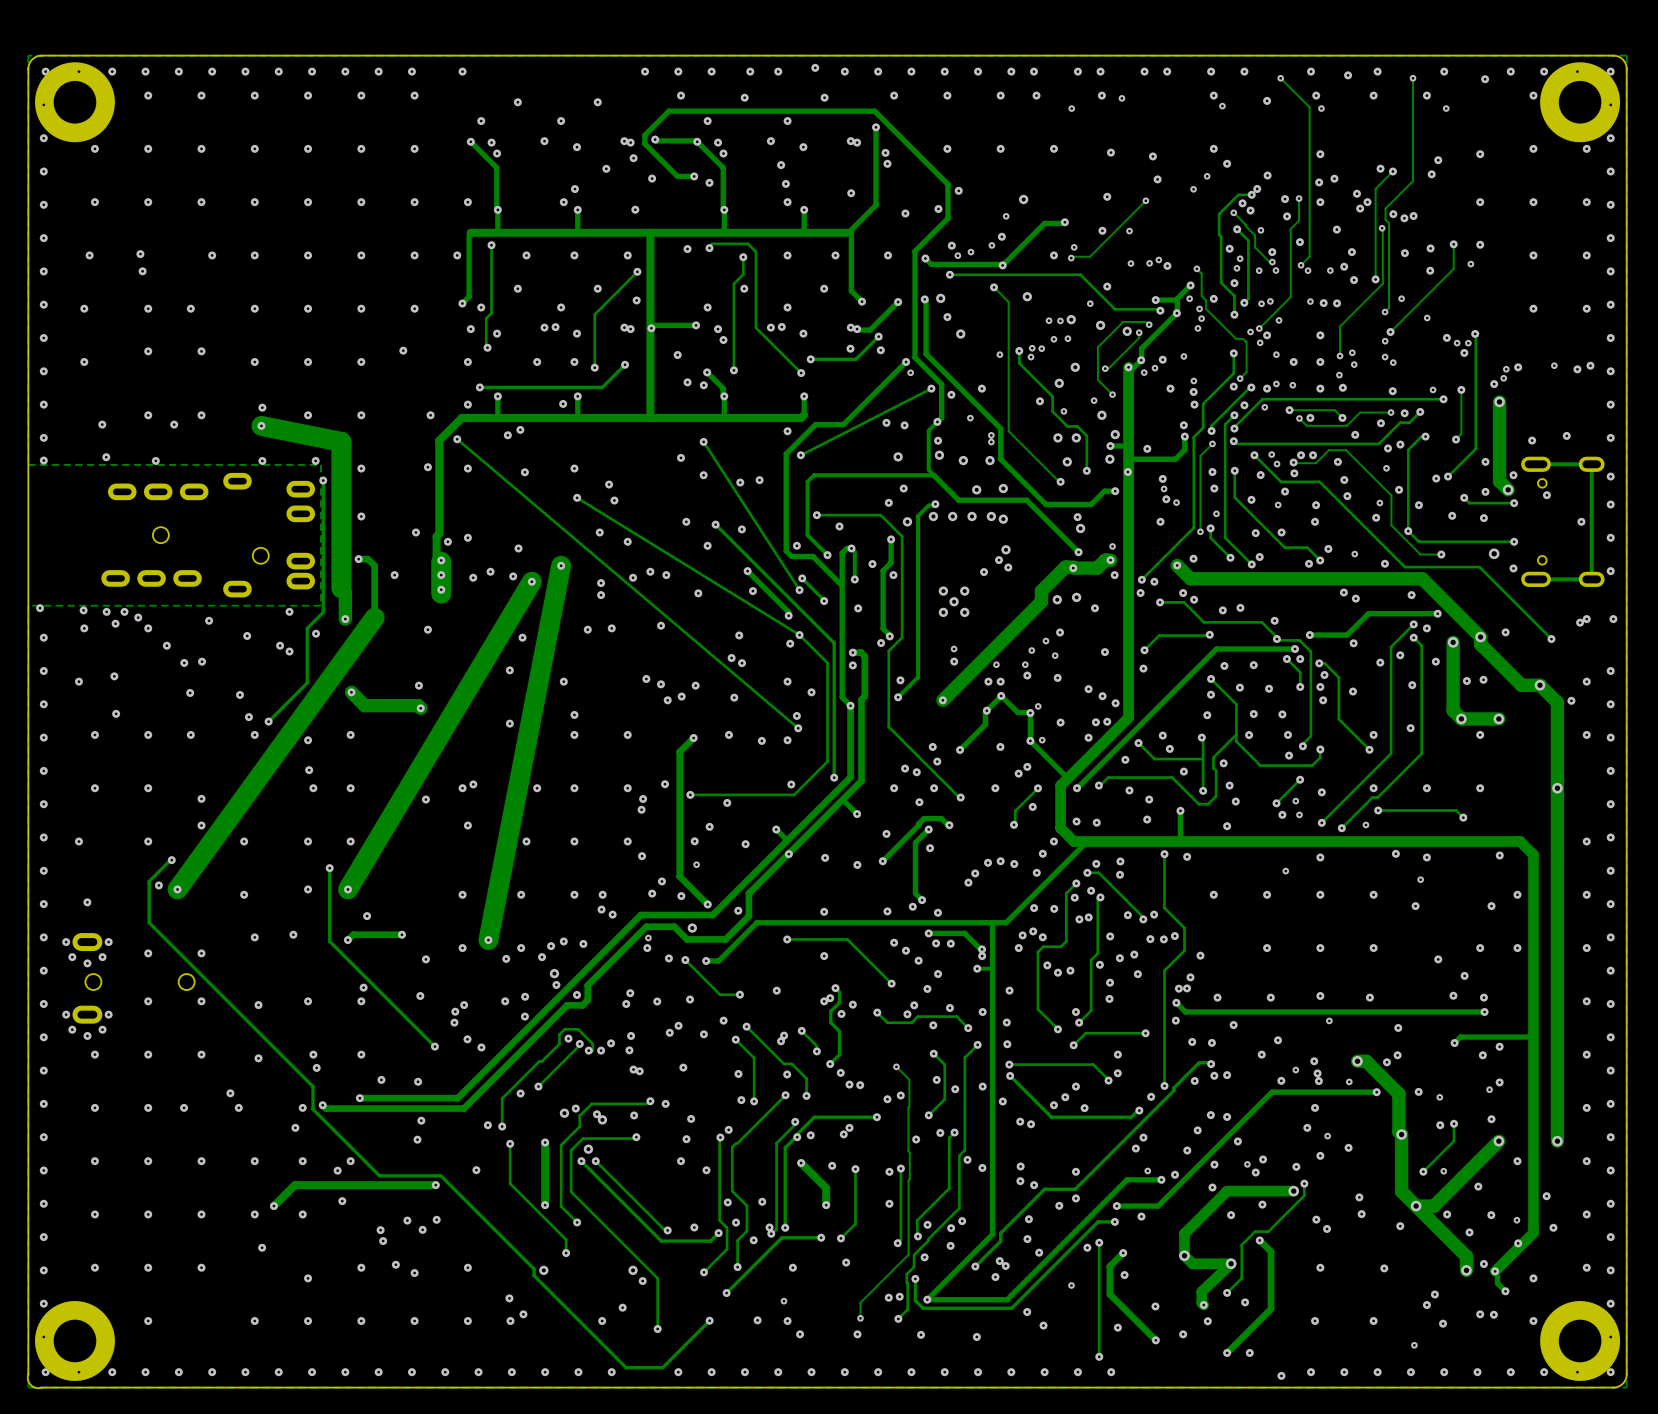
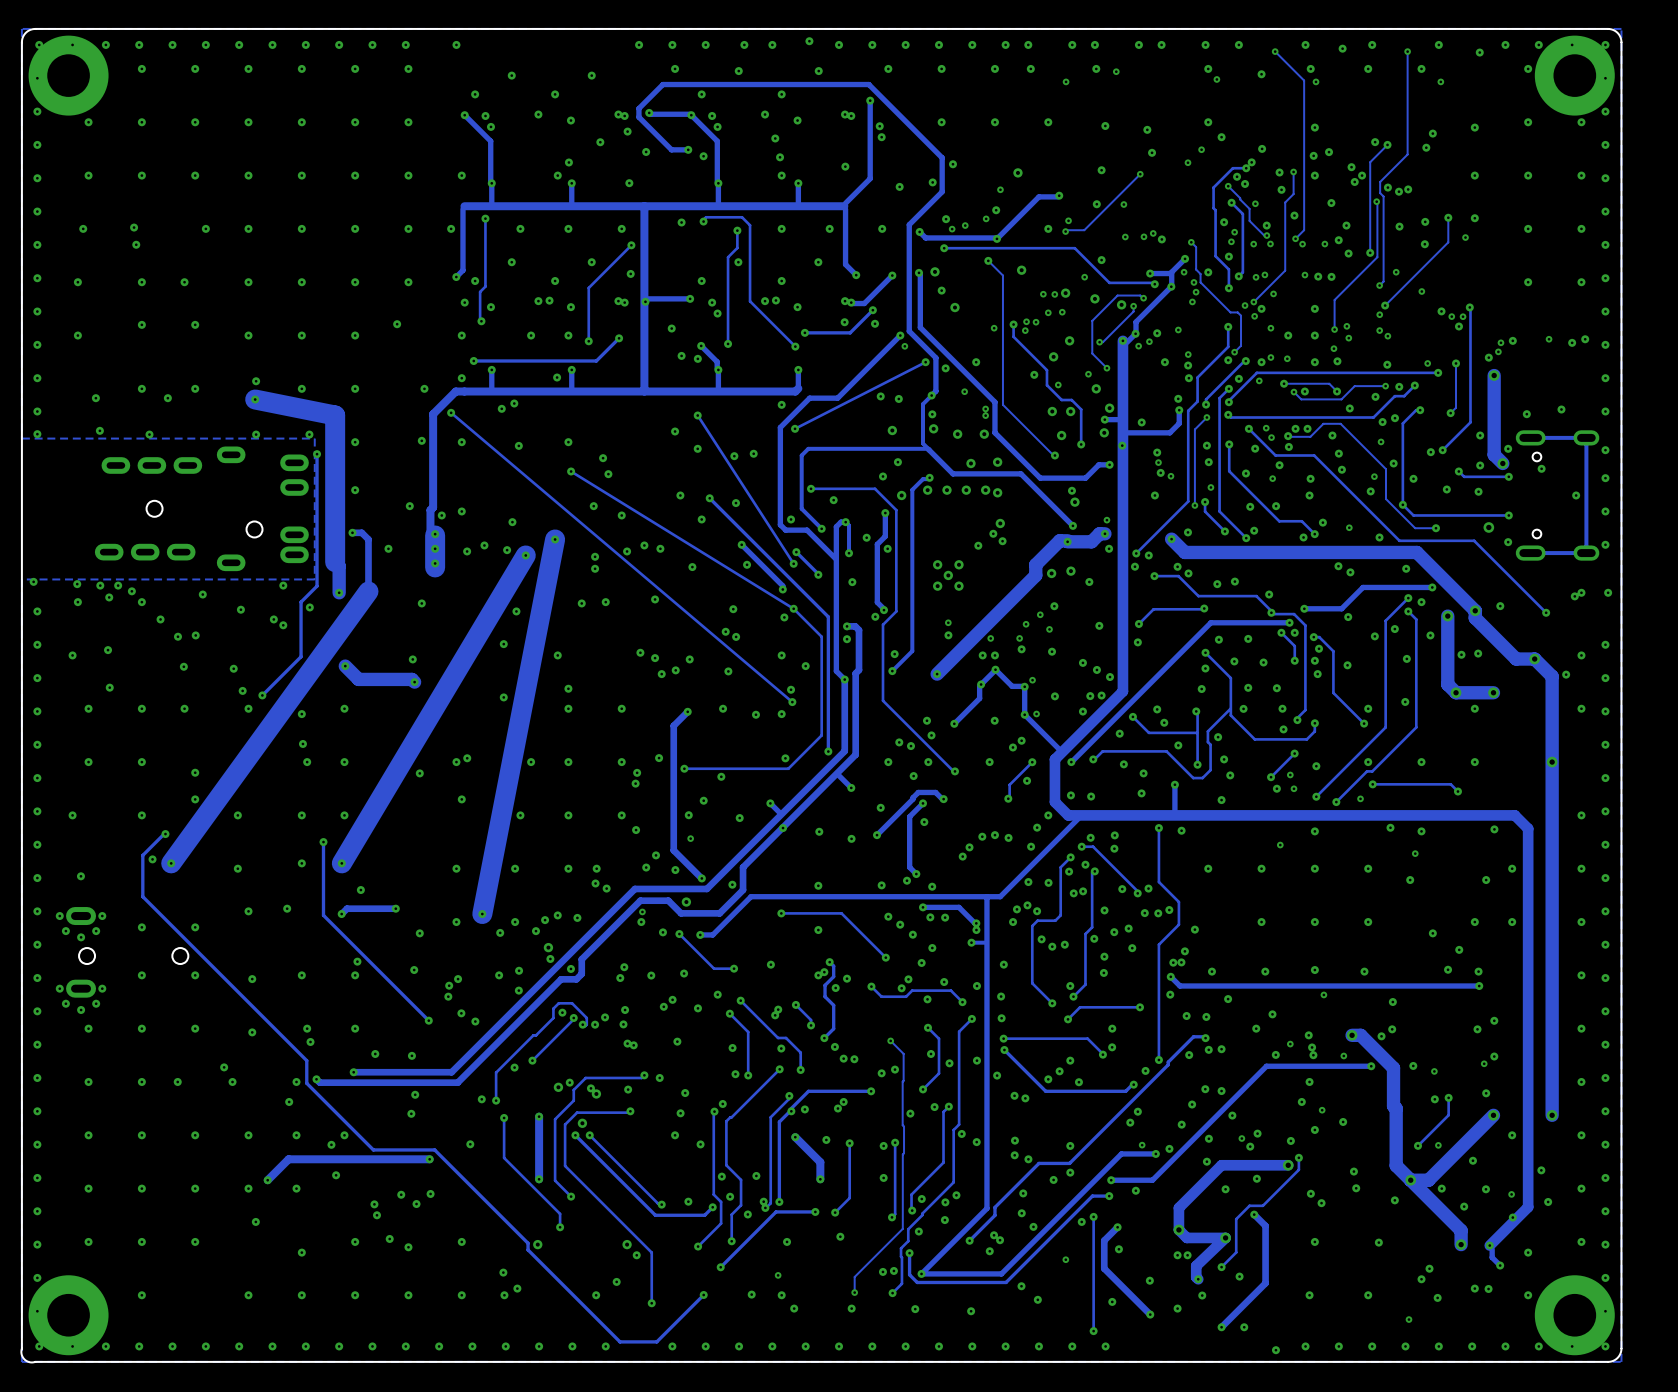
track: (1529, 1037) (1460, 1037) (1454, 1043) -> none
via: (1454, 1043) -> none
via: (1401, 1134) -> none
via: (1483, 1264) -> none
via: none -> (1177, 1255)
via: none -> (1187, 1255)

